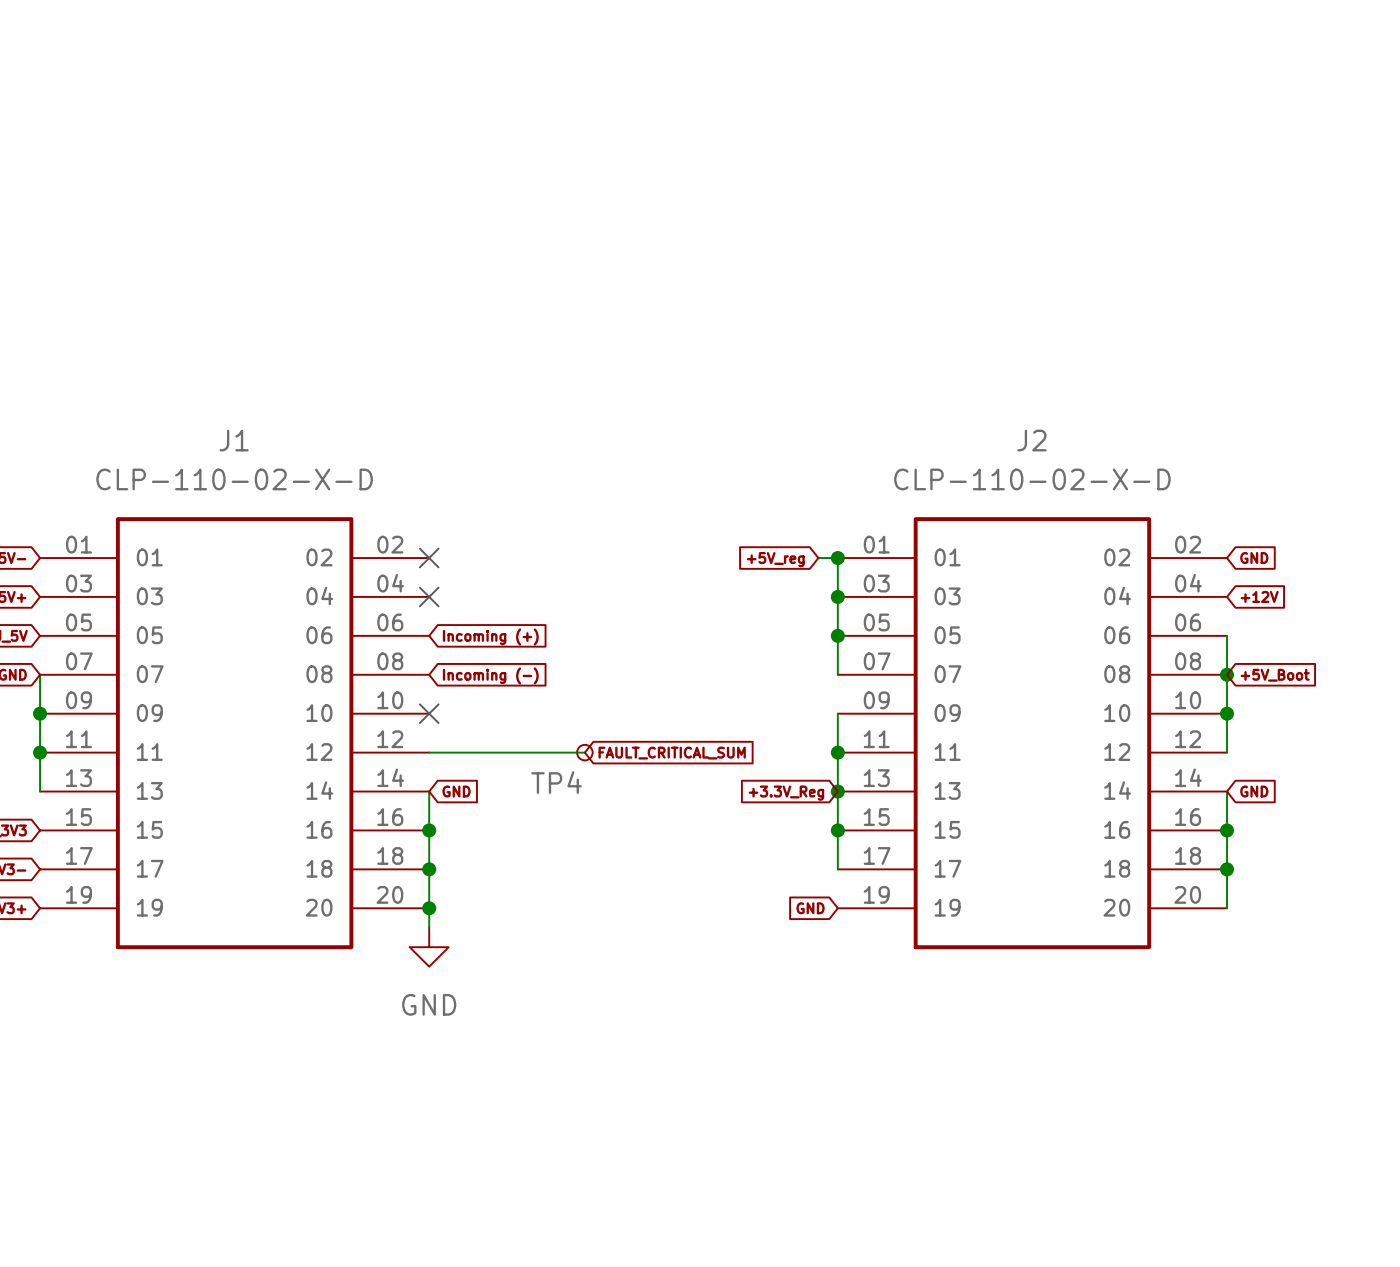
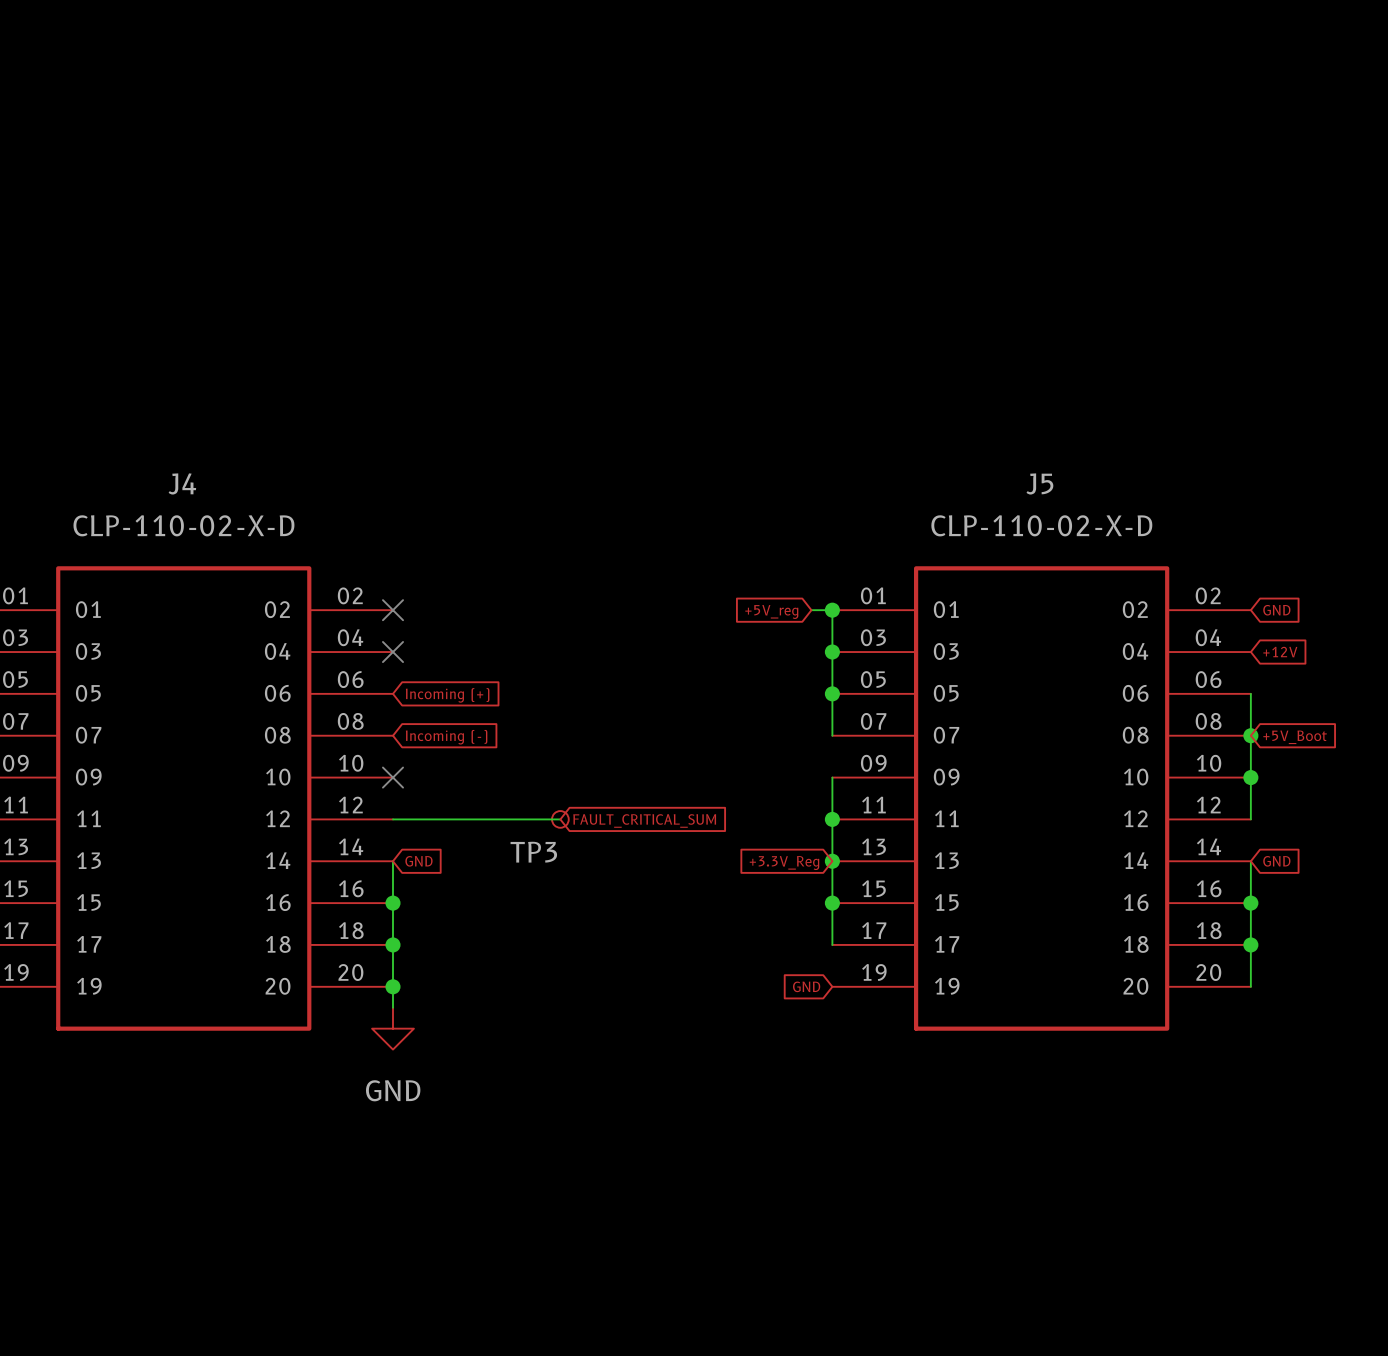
J1 name: J1 (234, 440) -> J4 (182, 483)
J2 name: J2 (1031, 440) -> J5 (1039, 483)
TP4 name: TP4 (556, 782) -> TP3 (533, 852)

